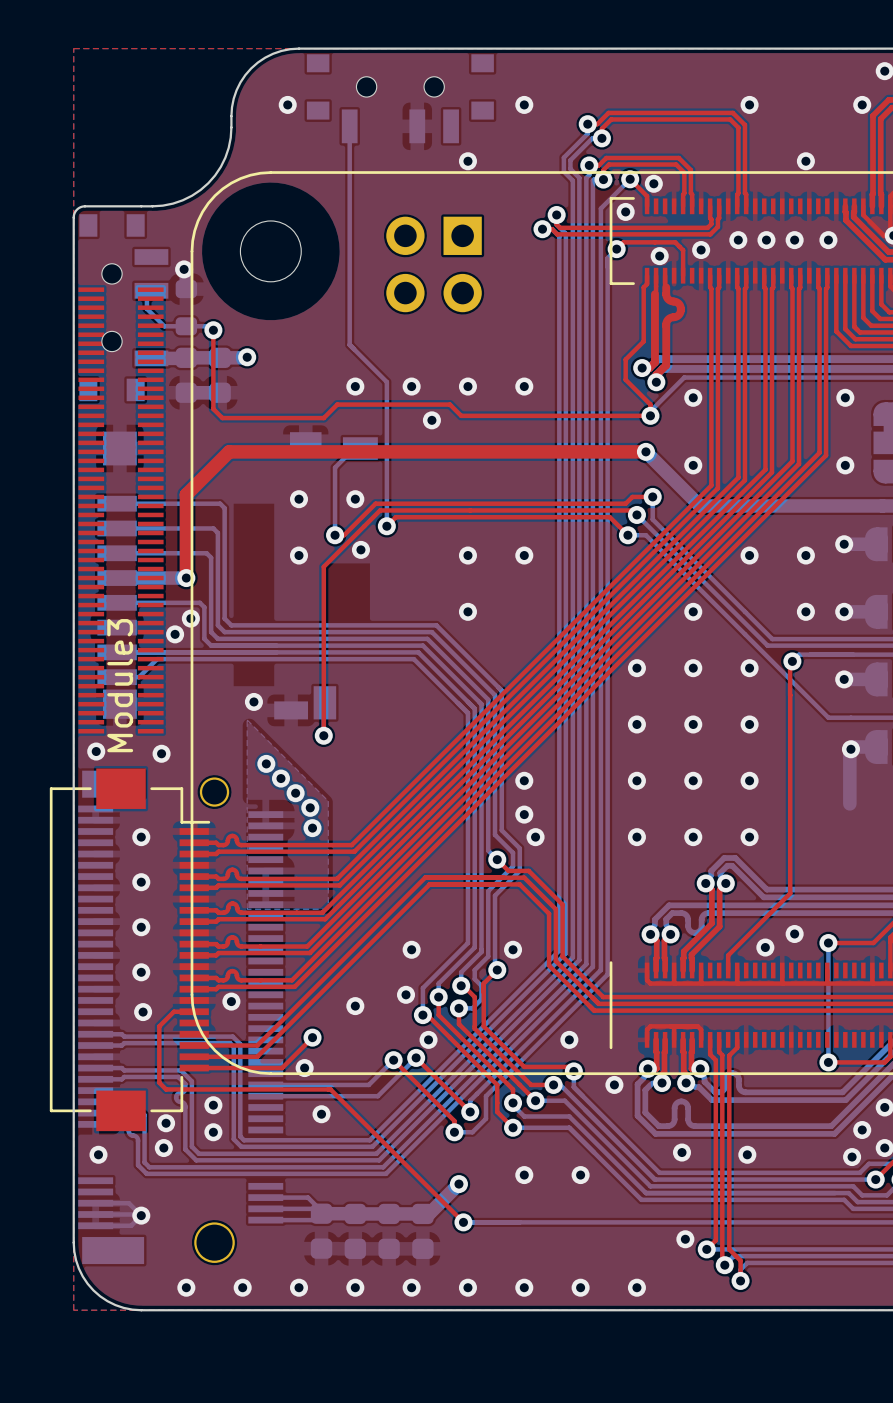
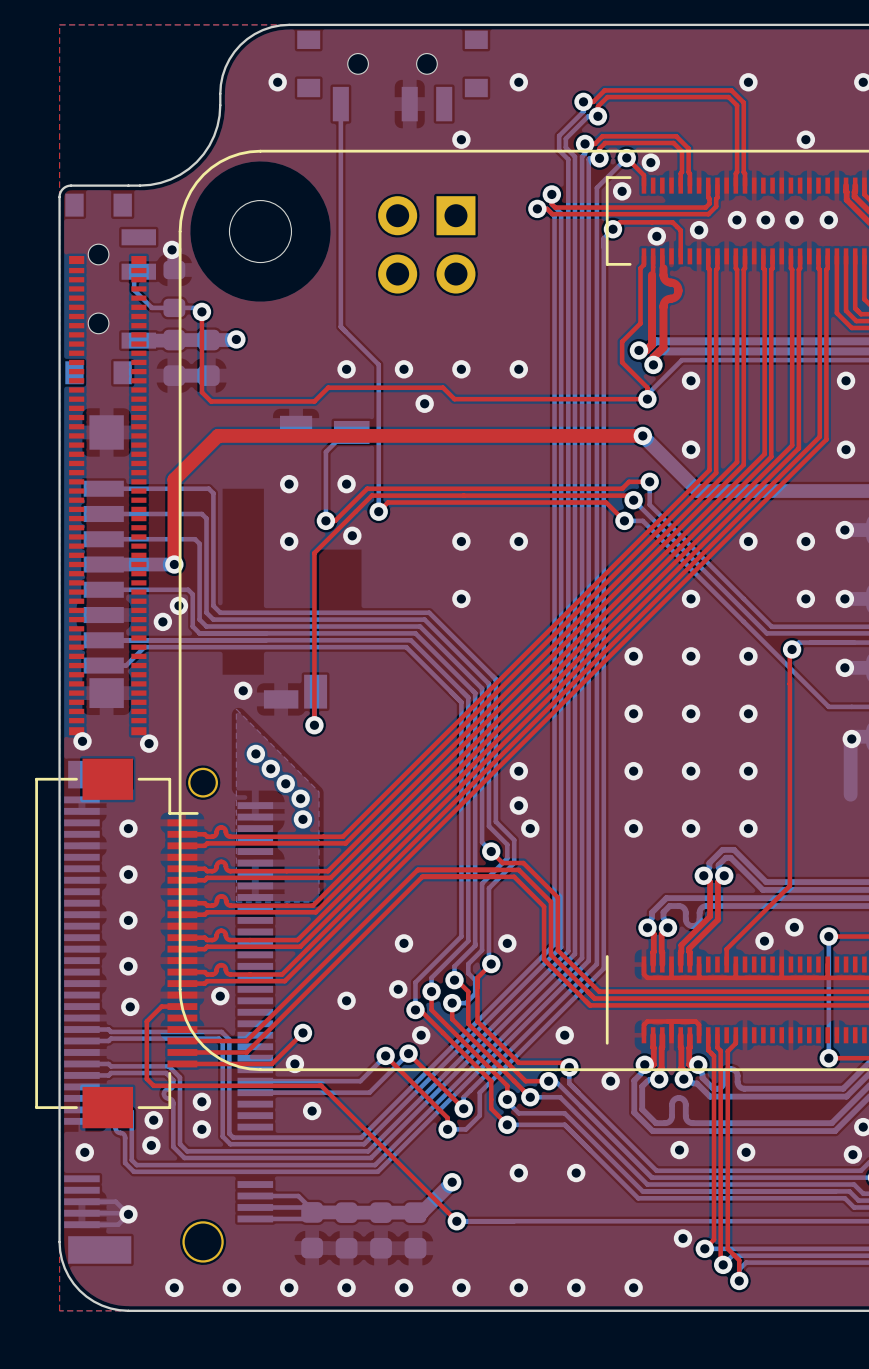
Module3: (121, 510) -> none
part: none -> (107, 495)

